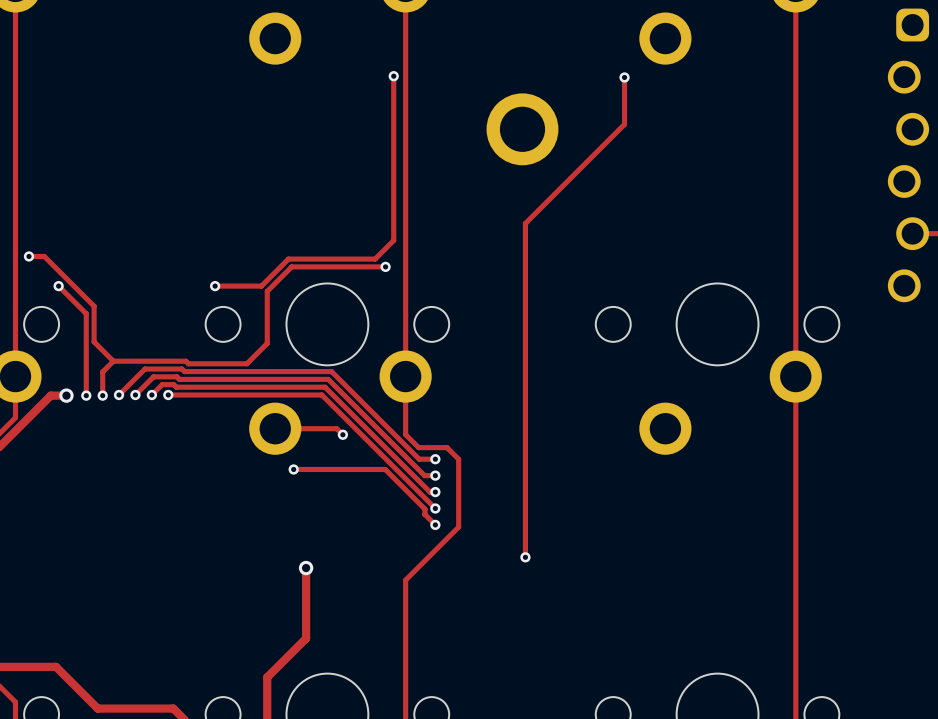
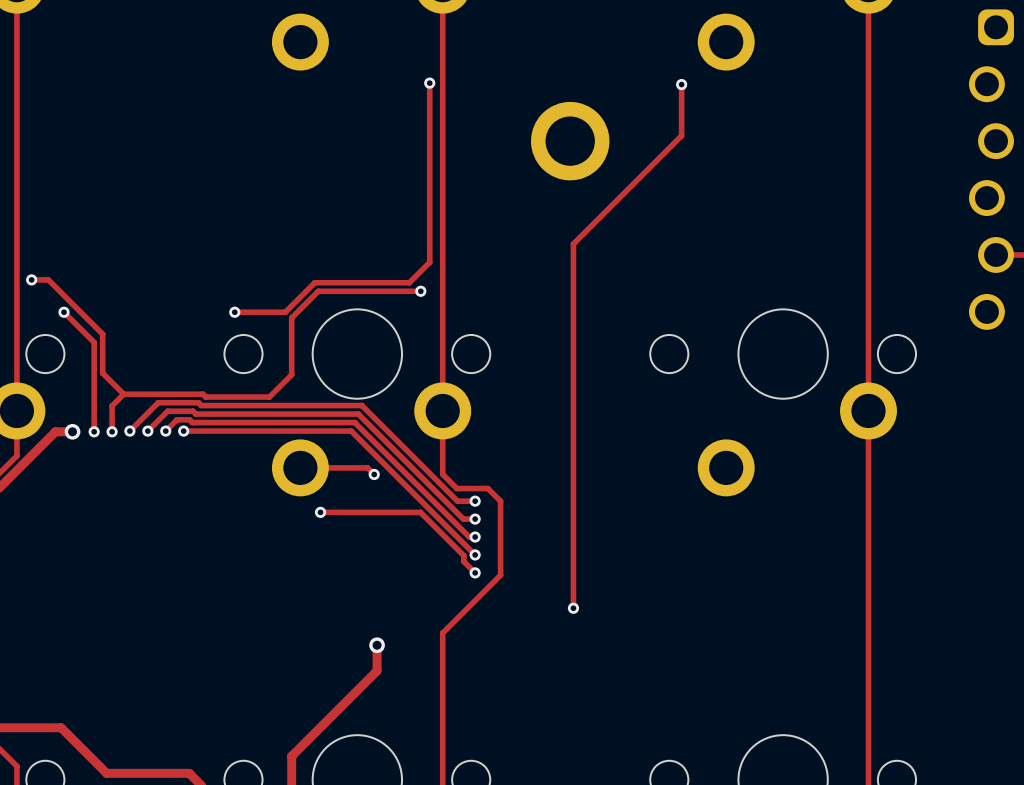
track: (306, 568) (306, 638) (267, 677) (267, 692) -> (377, 645) (377, 670) (291, 756)
via position: (306, 568) -> (377, 645)

